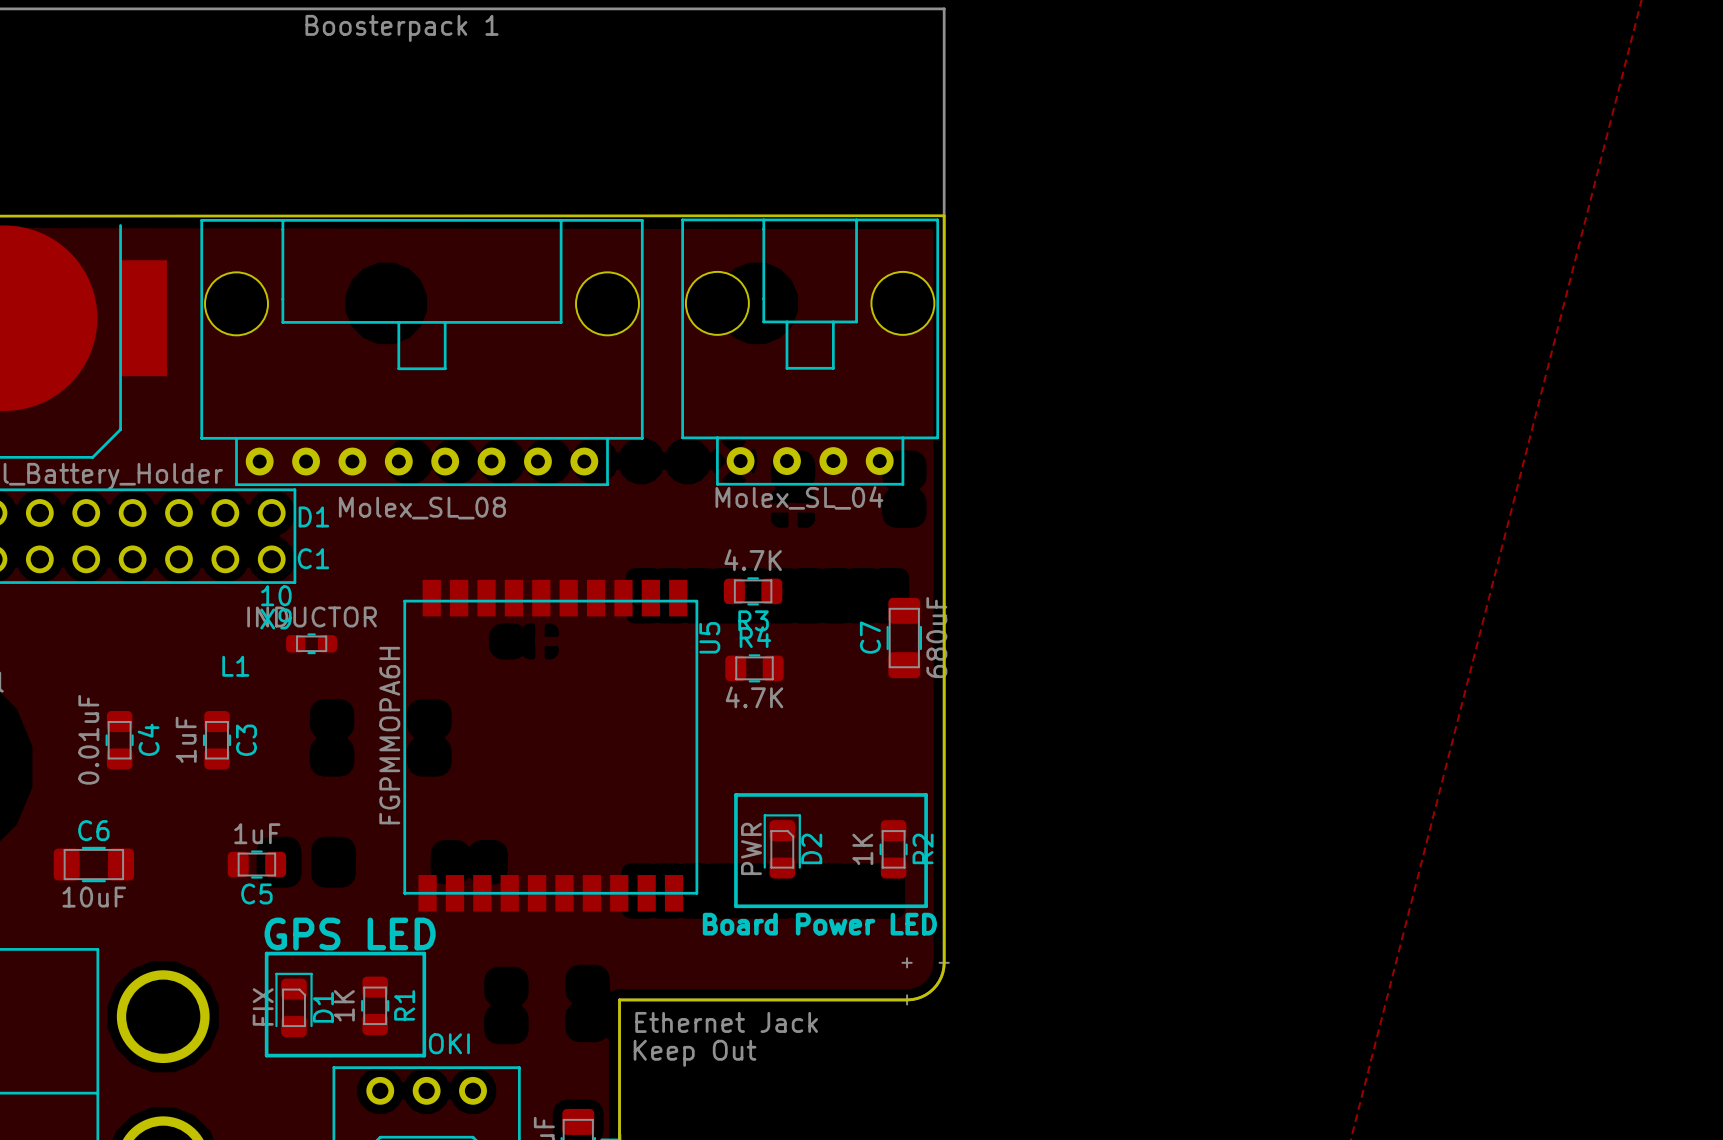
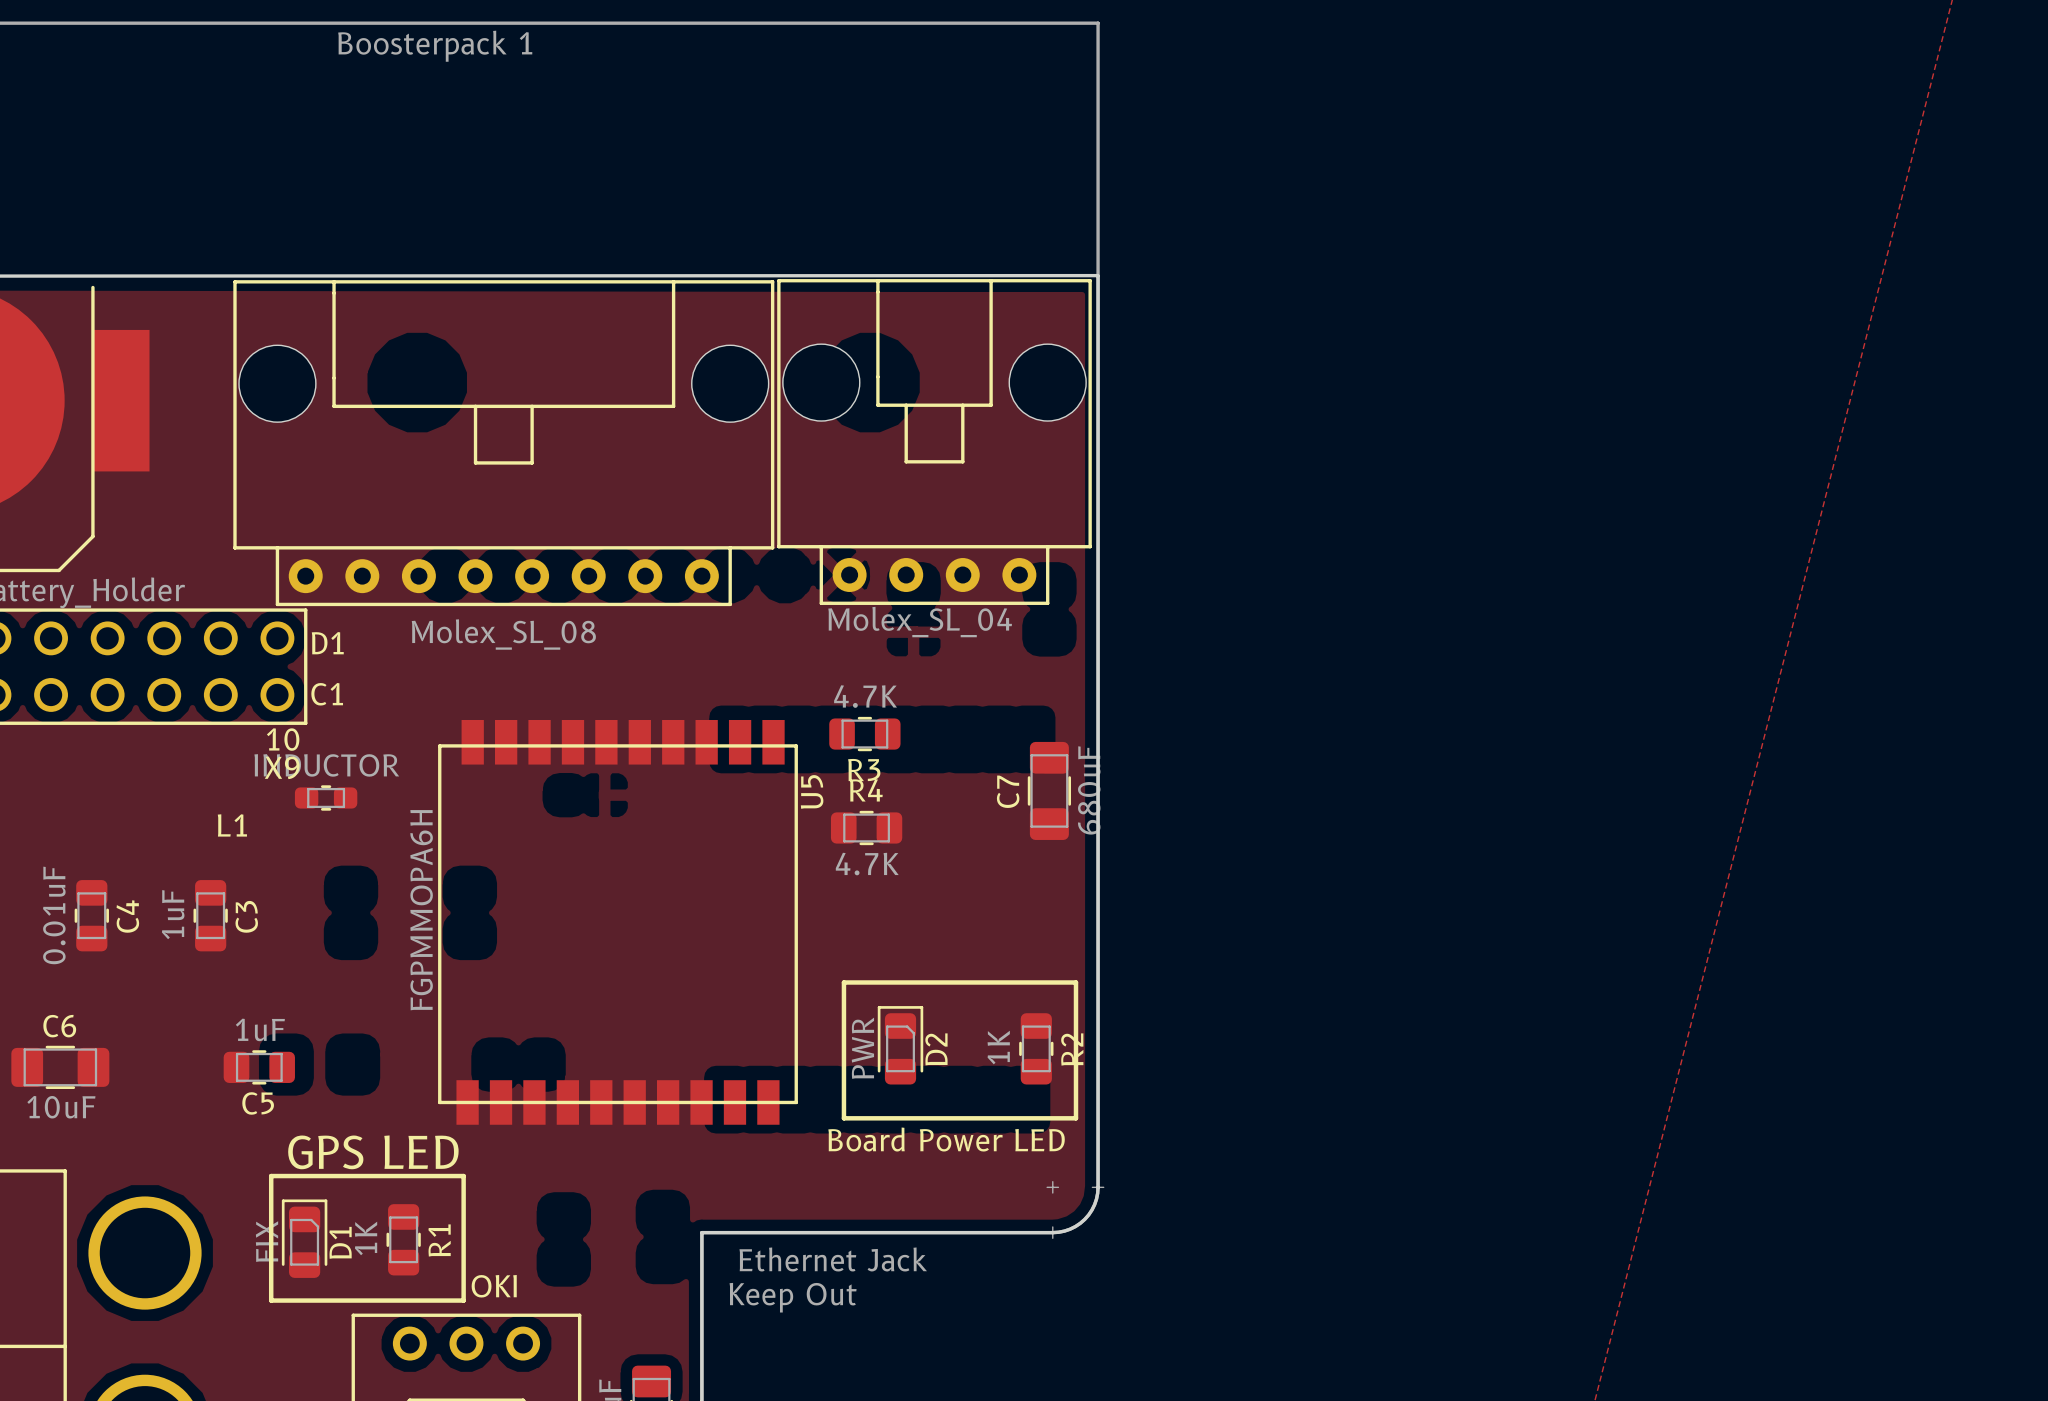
part position: (422, 352) -> (503, 443)

